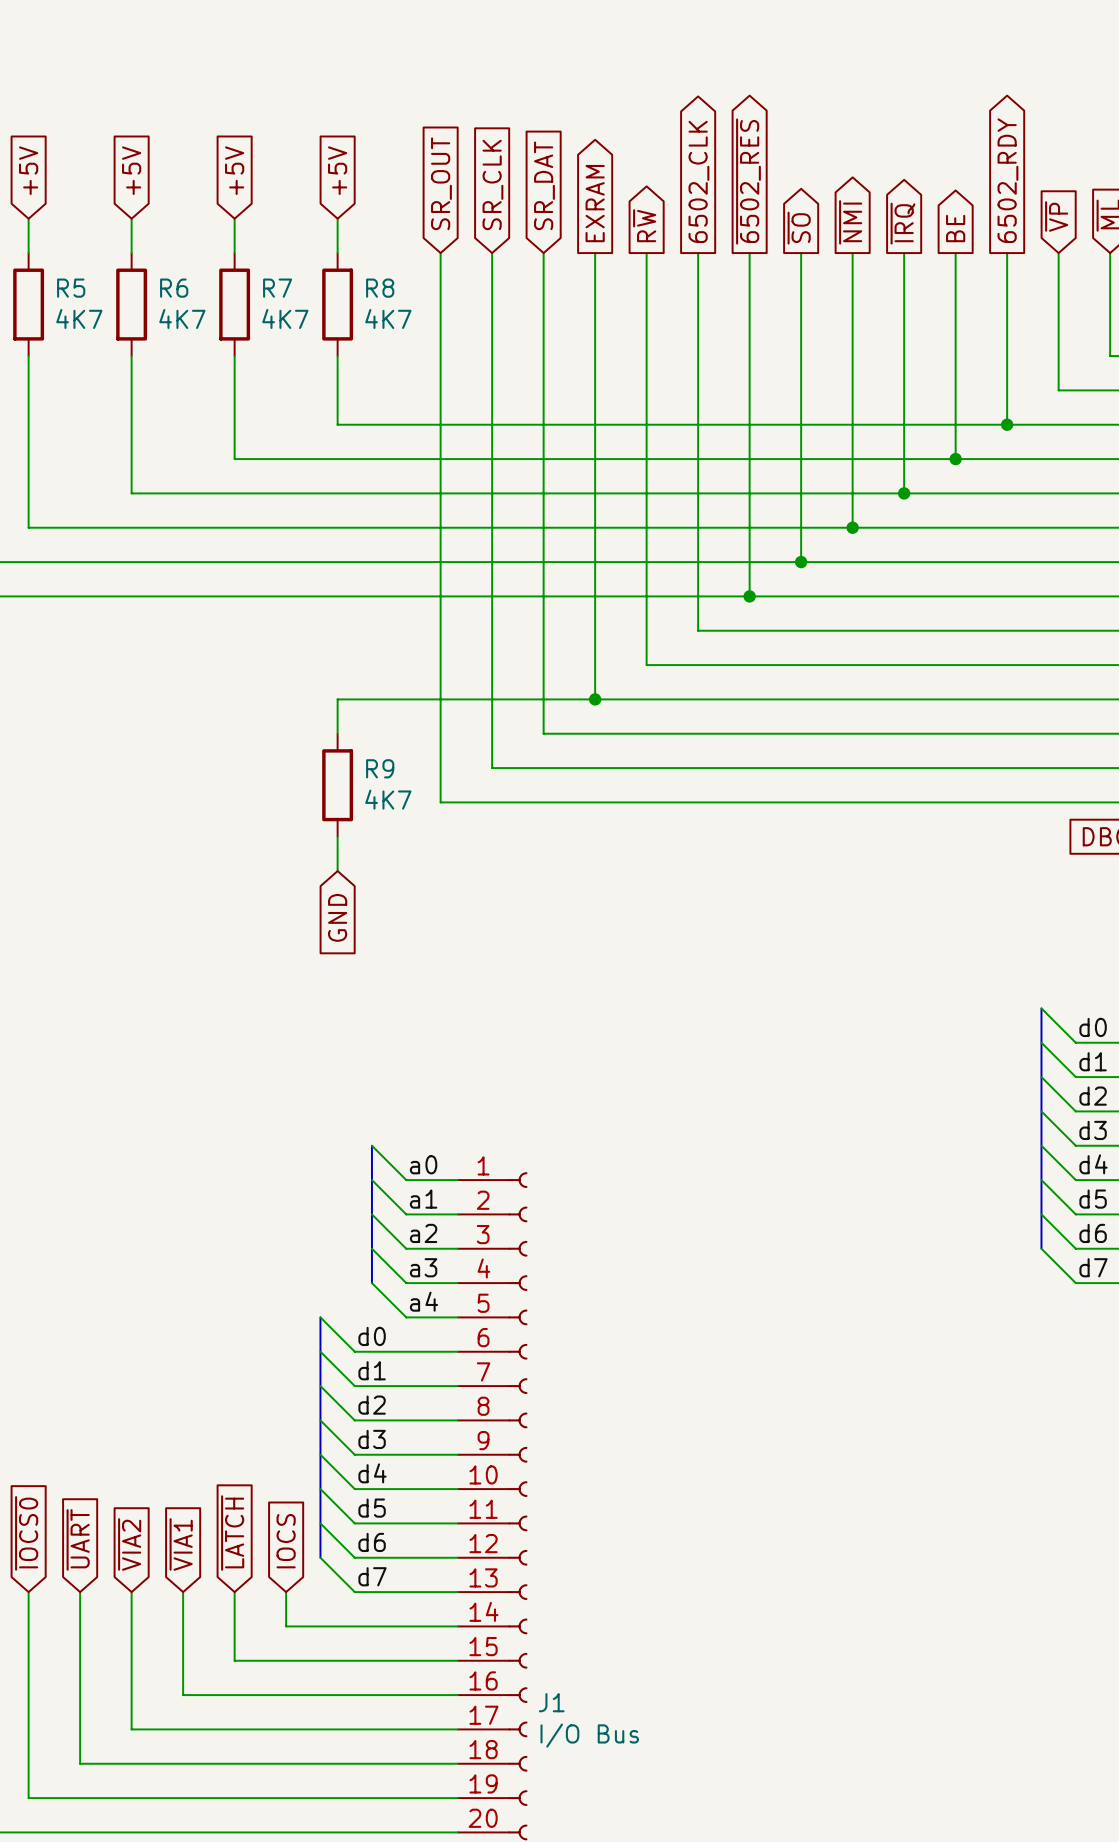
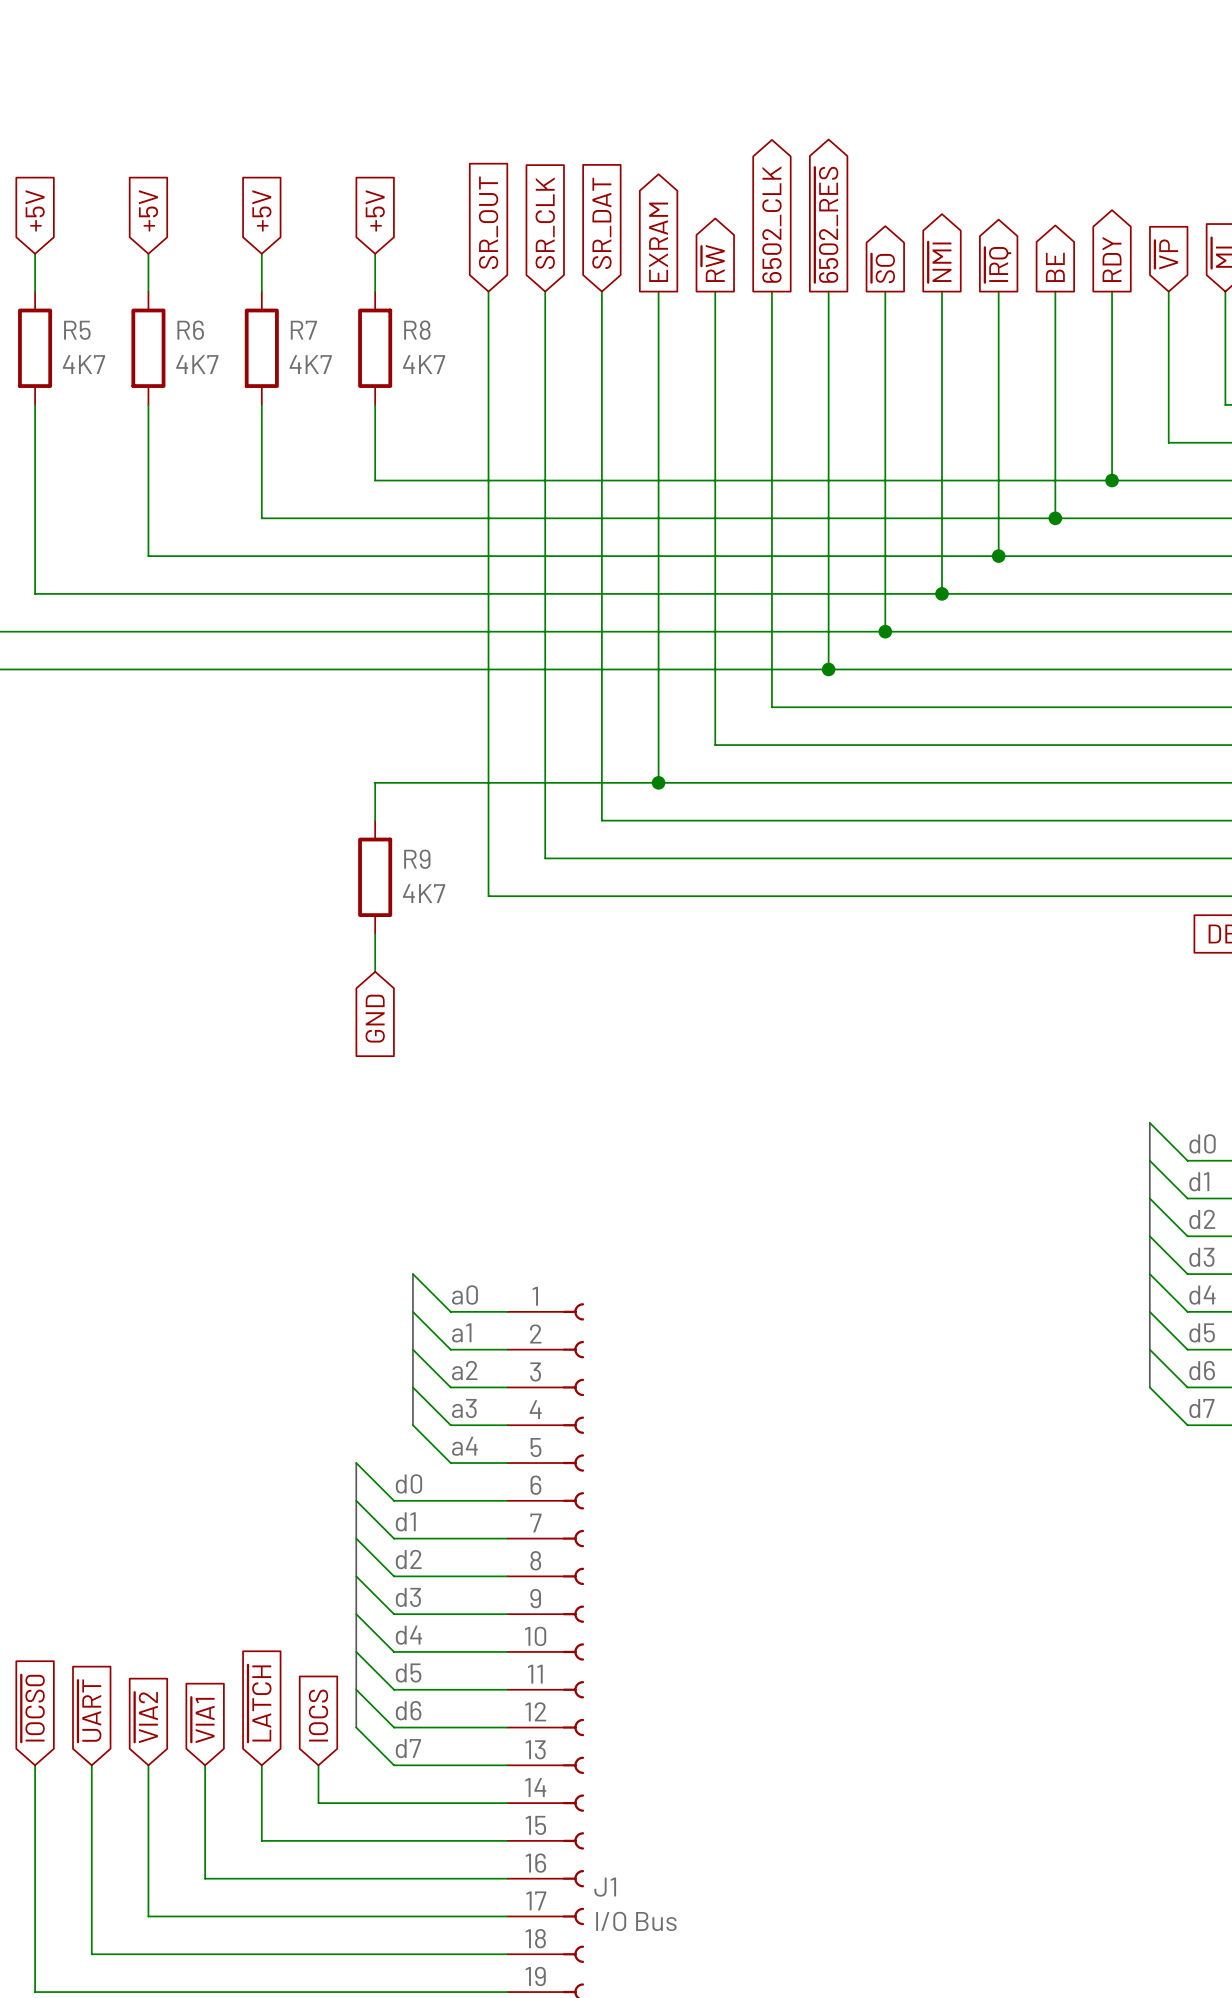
global label: 6502_RDY (1007, 180) -> RDY (1112, 259)

